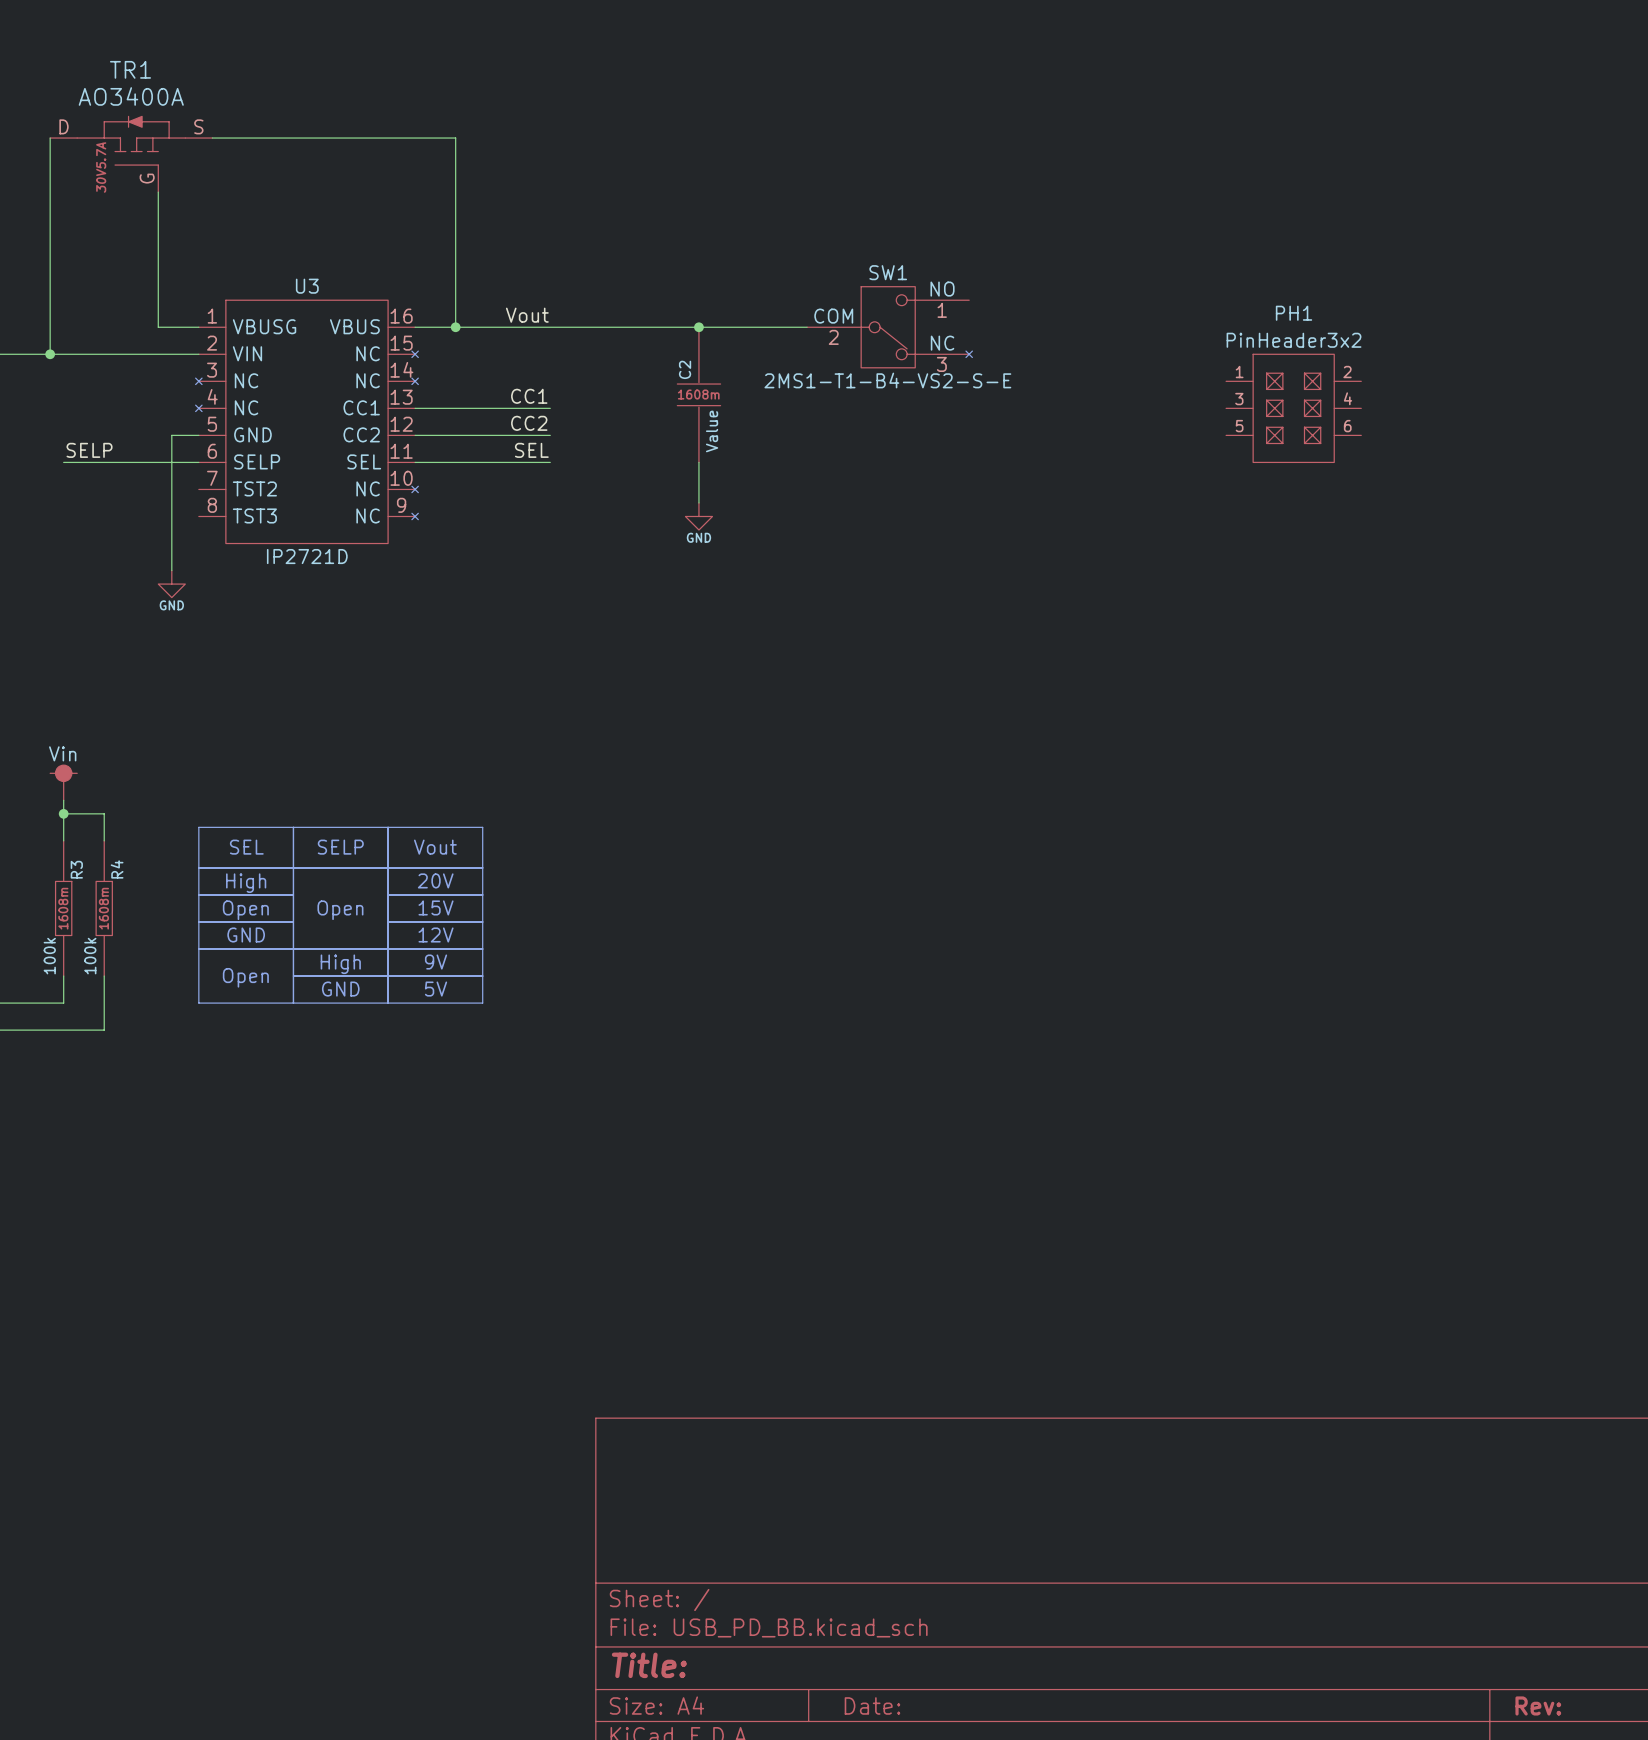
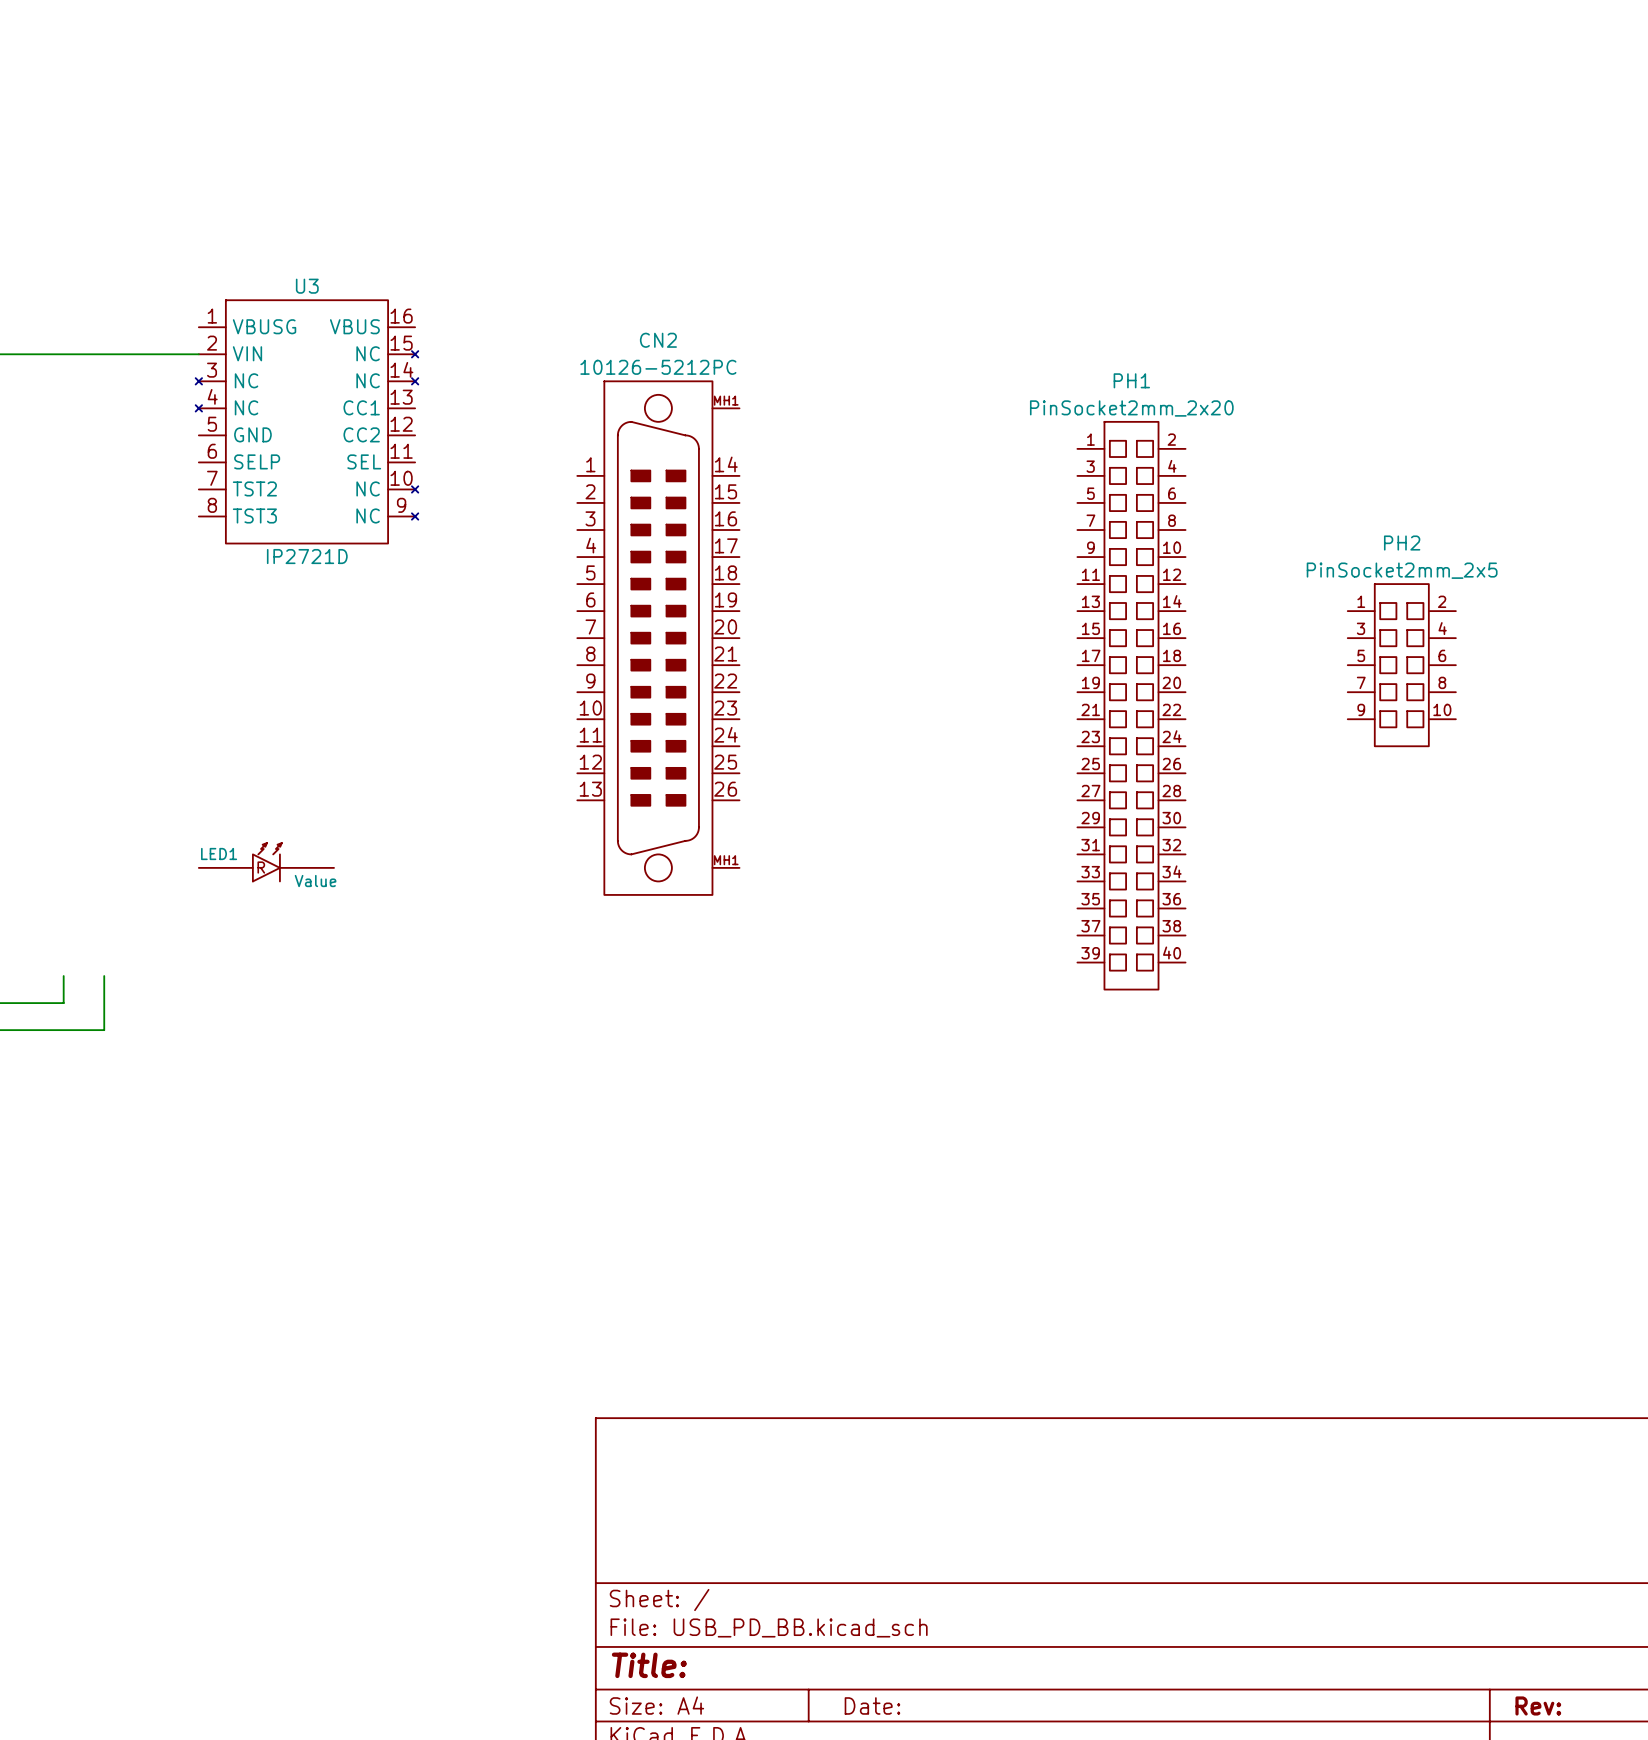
wire: (50, 138) (50, 354) -> none
wire: (212, 138) (455, 138) (455, 327) -> none
TR1: AO3400A (131, 154) -> none
wire: (158, 192) (158, 327) (198, 327) -> none
PH1 name position: PH1 (1294, 313) -> PH1 (1131, 380)
label: Vout (527, 315) -> none
wire: (415, 327) (807, 327) -> none
junction: (455, 327) -> none
junction: (698, 327) -> none
SW1: 2MS1-T1-B4-VS2-S-E (889, 327) -> none
PH1 value: PinHeader3x2 (1294, 340) -> PinSocket2mm_2x20 (1131, 408)
junction: (50, 354) -> none
PH1 symbol: [1226, 354, 1362, 463] -> [1077, 421, 1186, 990]
C2: Value (698, 394) -> none
label: CC1 (529, 396) -> none
wire: (415, 408) (550, 408) -> none
label: CC2 (529, 423) -> none
wire: (198, 435) (171, 435) (171, 570) -> none
wire: (415, 435) (550, 435) -> none
label: SELP (89, 450) -> none
label: SEL (531, 450) -> none
wire: (63, 462) (198, 462) -> none
wire: (415, 462) (550, 462) -> none
power symbol: GND (698, 516) -> none
power symbol: GND (171, 584) -> none
CN2: none -> 10126-5212PC (658, 638)
PH2: none -> PinSocket2mm_2x5 (1401, 665)
power symbol: Vin (63, 782) -> none
wire: (63, 800) (63, 840) -> none
wire: (63, 813) (104, 813) (104, 840) -> none
junction: (63, 813) -> none
line: (198, 827) (198, 1003) (482, 1003) (482, 827) (198, 827) -> none
line: (293, 827) (293, 1003) -> none
line: (388, 827) (388, 1003) -> none
text: SEL (246, 847) -> none
text: SELP (340, 847) -> none
text: Vout (435, 847) -> none
LED1: none -> Value (266, 862)
line: (198, 867) (482, 867) -> none
text: 20V (435, 880) -> none
text: High (246, 883) -> none
line: (198, 894) (293, 894) -> none
line: (388, 894) (482, 894) -> none
text: 15V (436, 907) -> none
R3: 100k (63, 908) -> none
R4: 100k (104, 908) -> none
text: Open (245, 910) -> none
text: Open (340, 910) -> none
line: (198, 921) (293, 921) -> none
line: (388, 921) (482, 921) -> none
text: GND (246, 934) -> none
text: 12V (436, 934) -> none
line: (198, 949) (482, 949) -> none
text: 9V (436, 962) -> none
text: High (340, 964) -> none
line: (293, 976) (482, 976) -> none
text: Open (245, 977) -> none
text: GND (340, 989) -> none
text: 5V (436, 989) -> none

